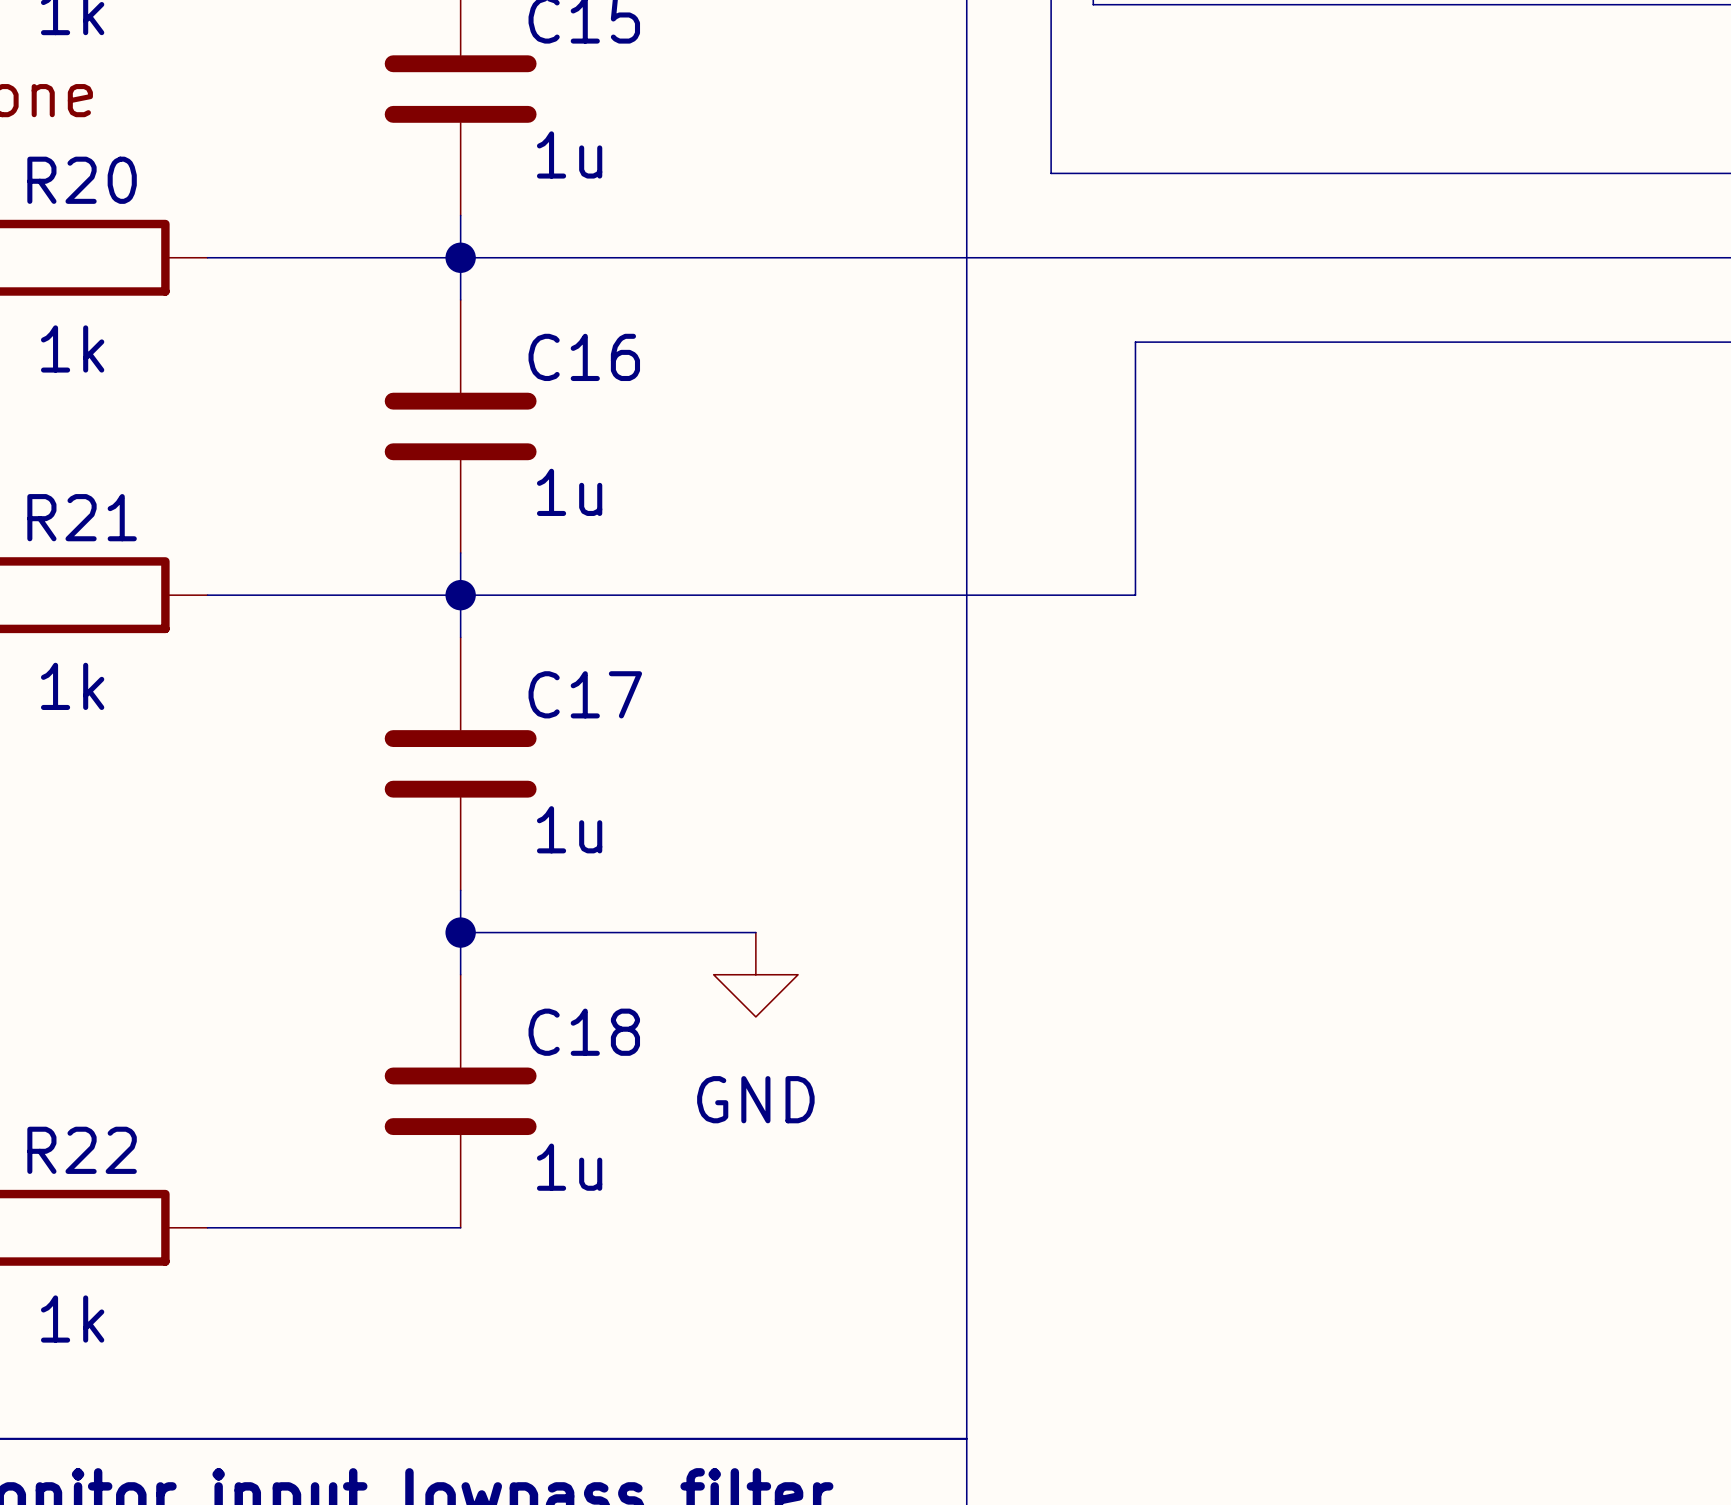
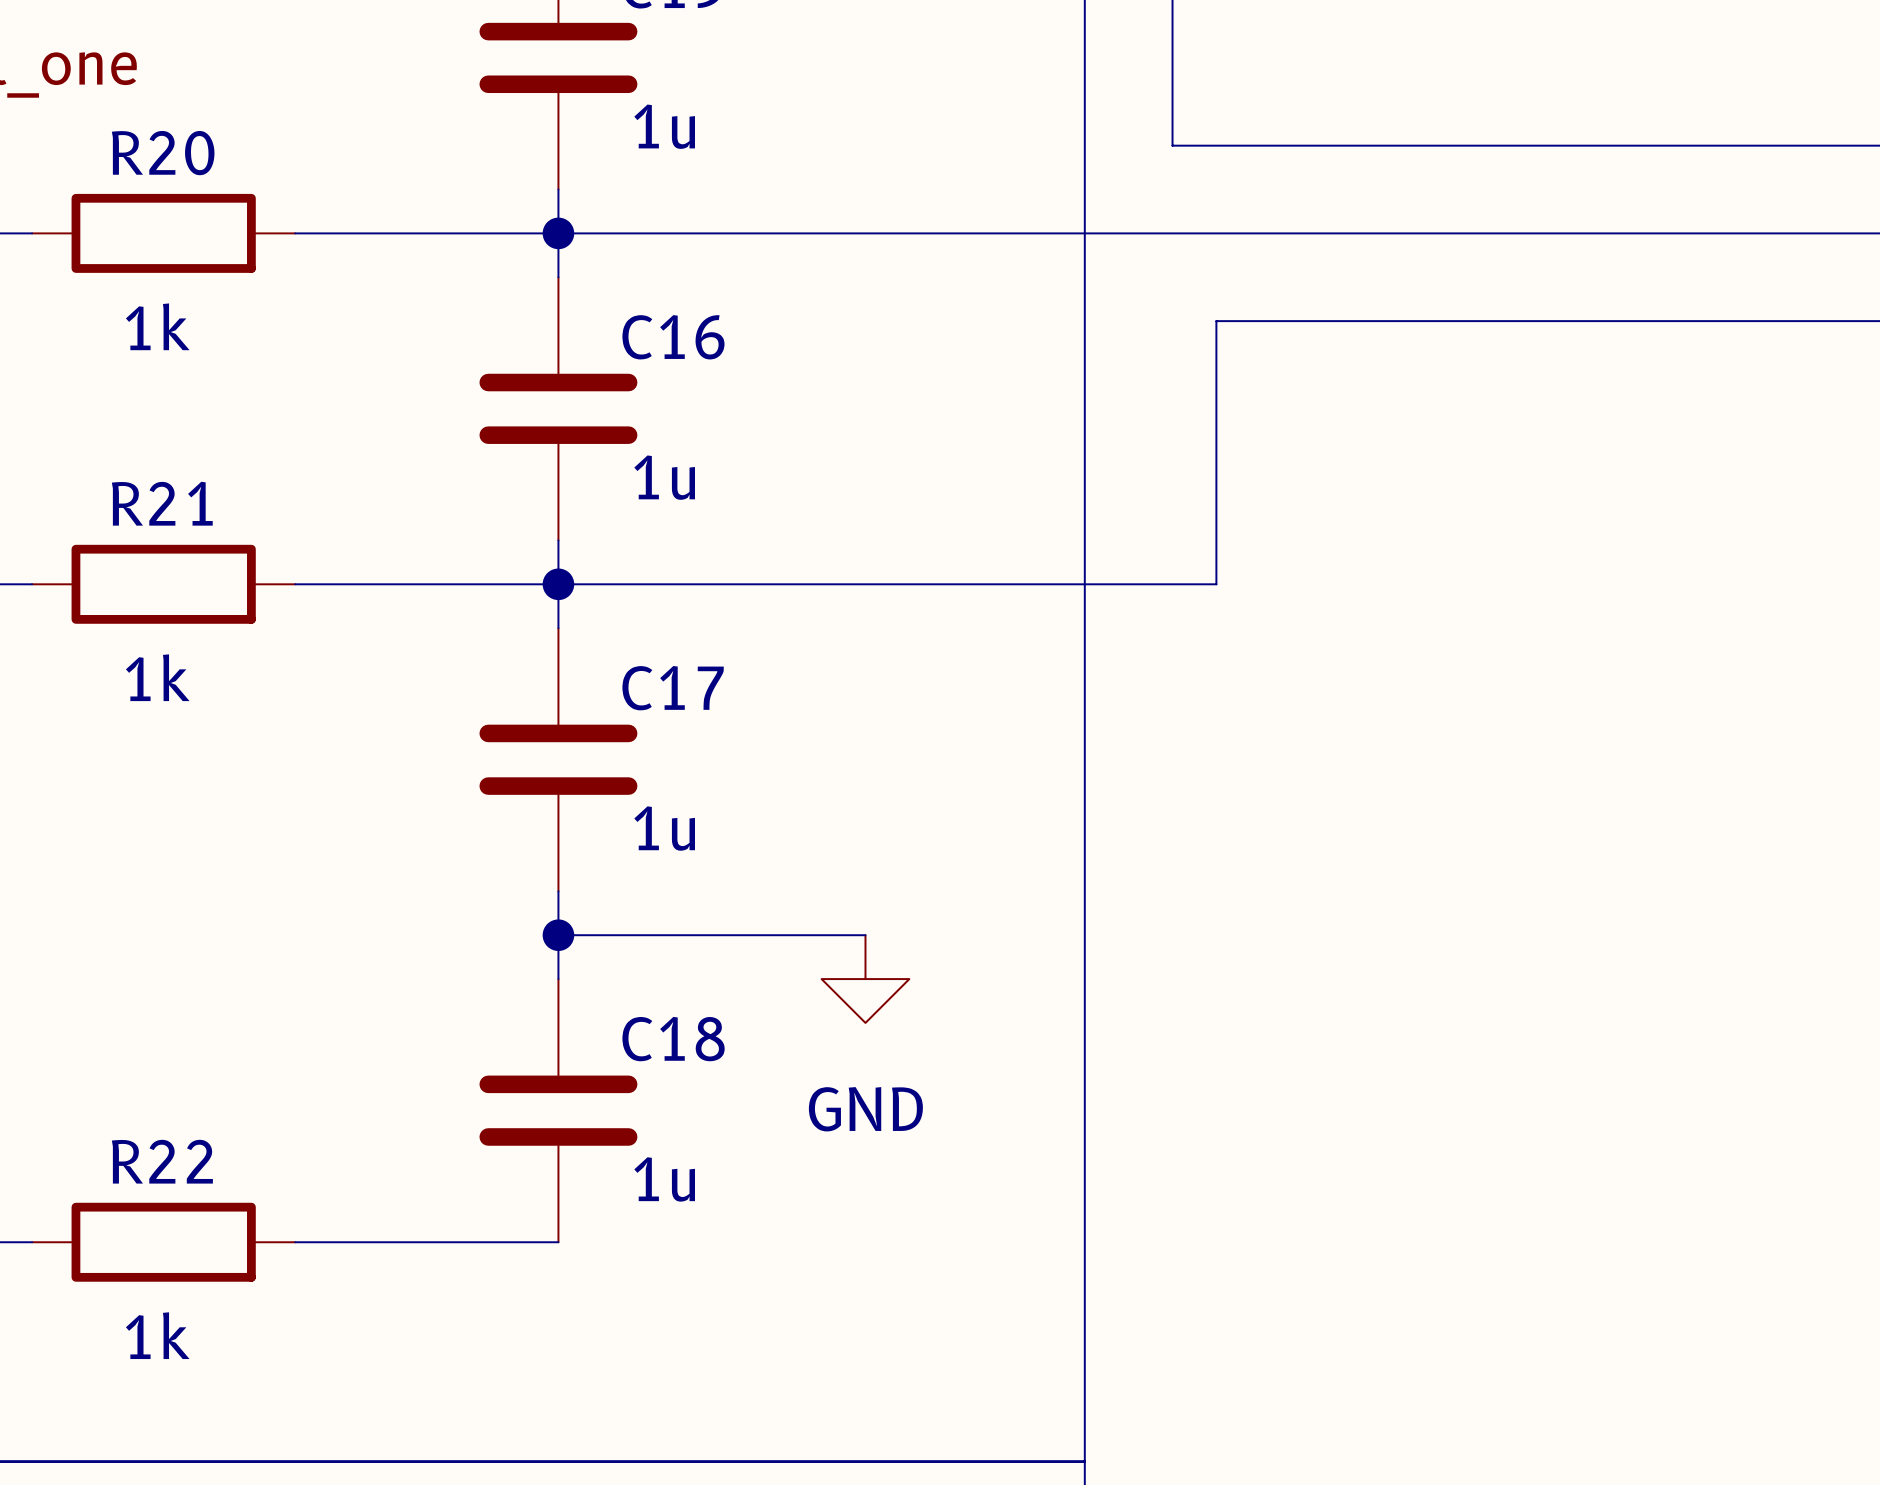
wire: (1135, 342) (1135, 595) (1093, 595) -> (1260, 321) (1216, 321) (1216, 584)

